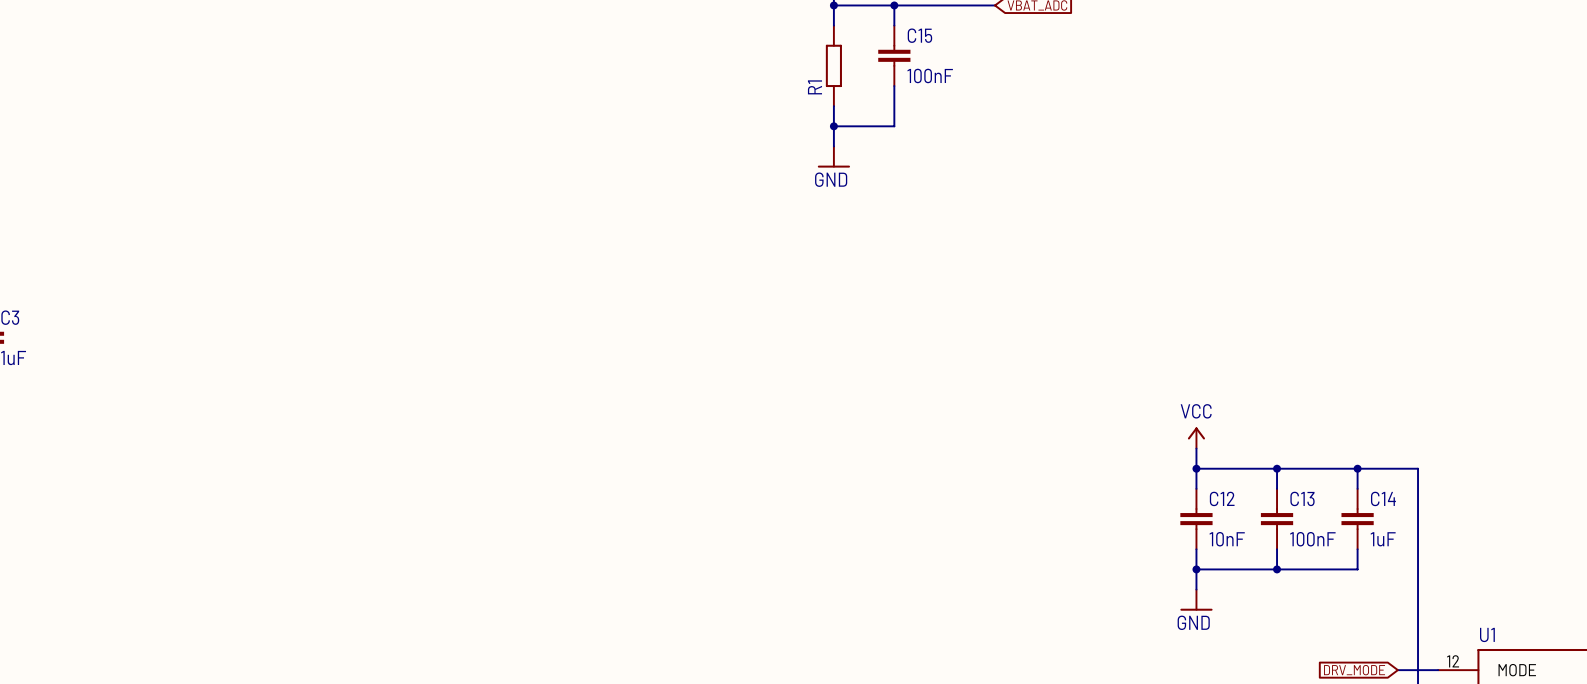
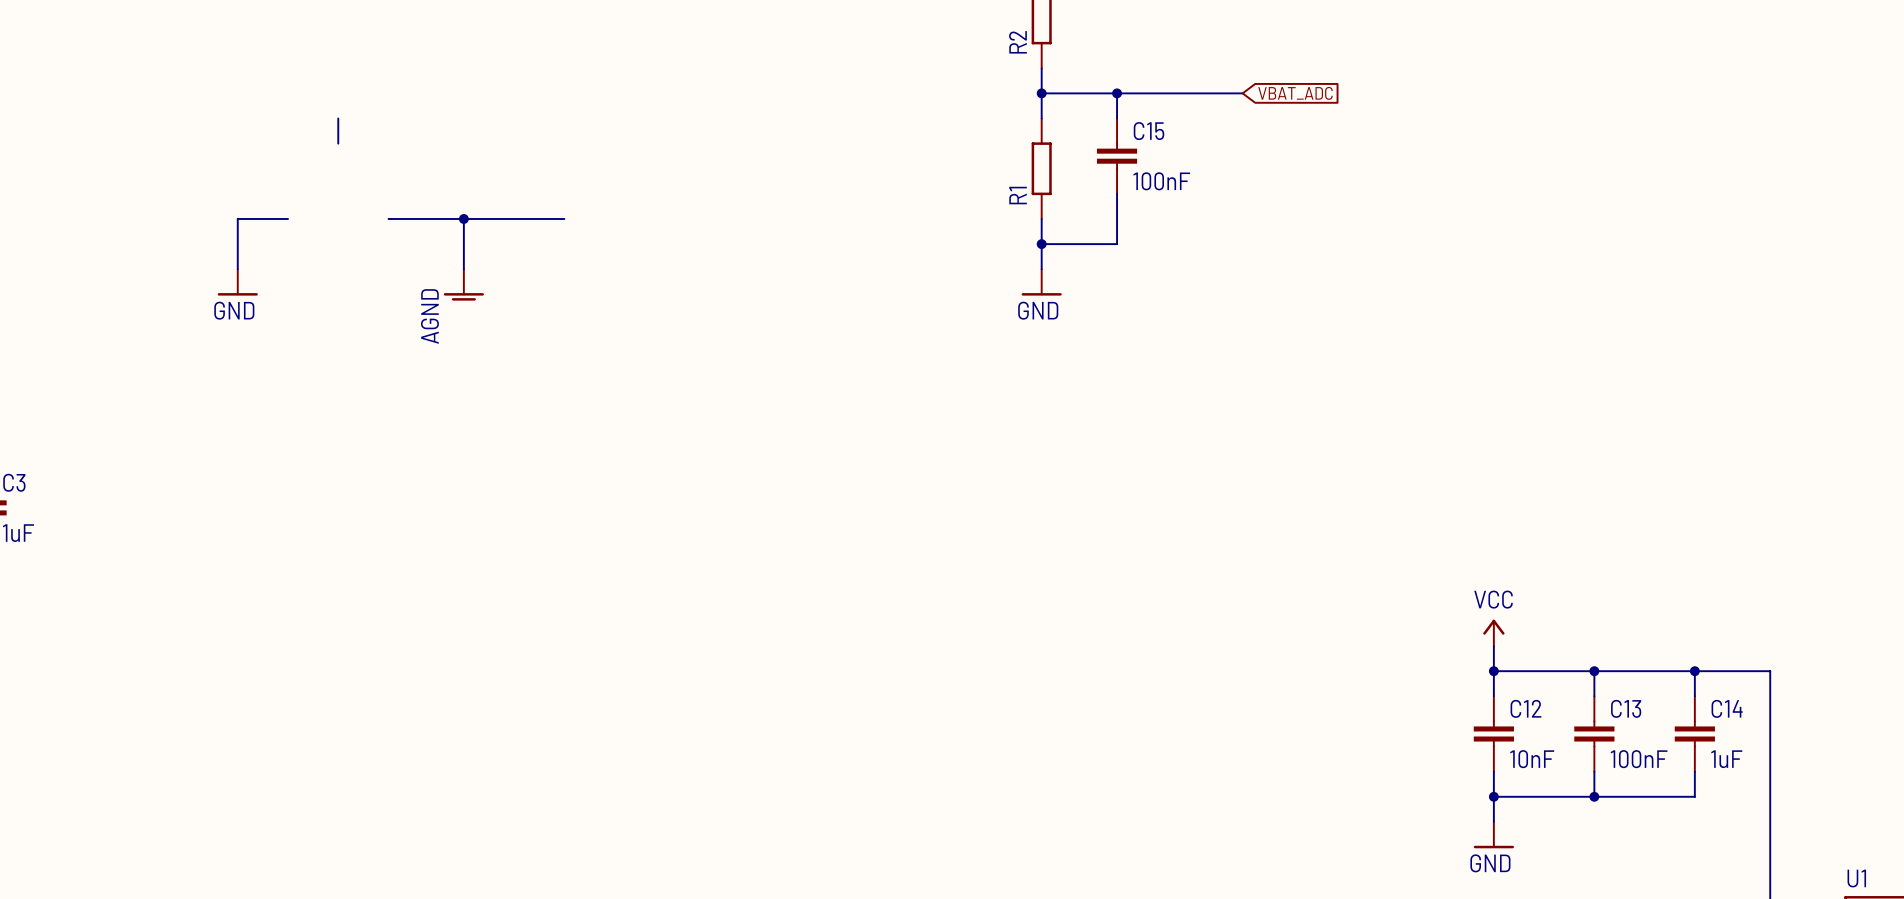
wire: none -> (338, 118) (338, 143)
wire: none -> (288, 218) (237, 218) (237, 269)
wire: none -> (388, 218) (564, 218)
wire: none -> (463, 218) (463, 269)
junction: none -> (463, 218)
power symbol: none -> GND (237, 282)
power symbol: none -> AGND (463, 284)

